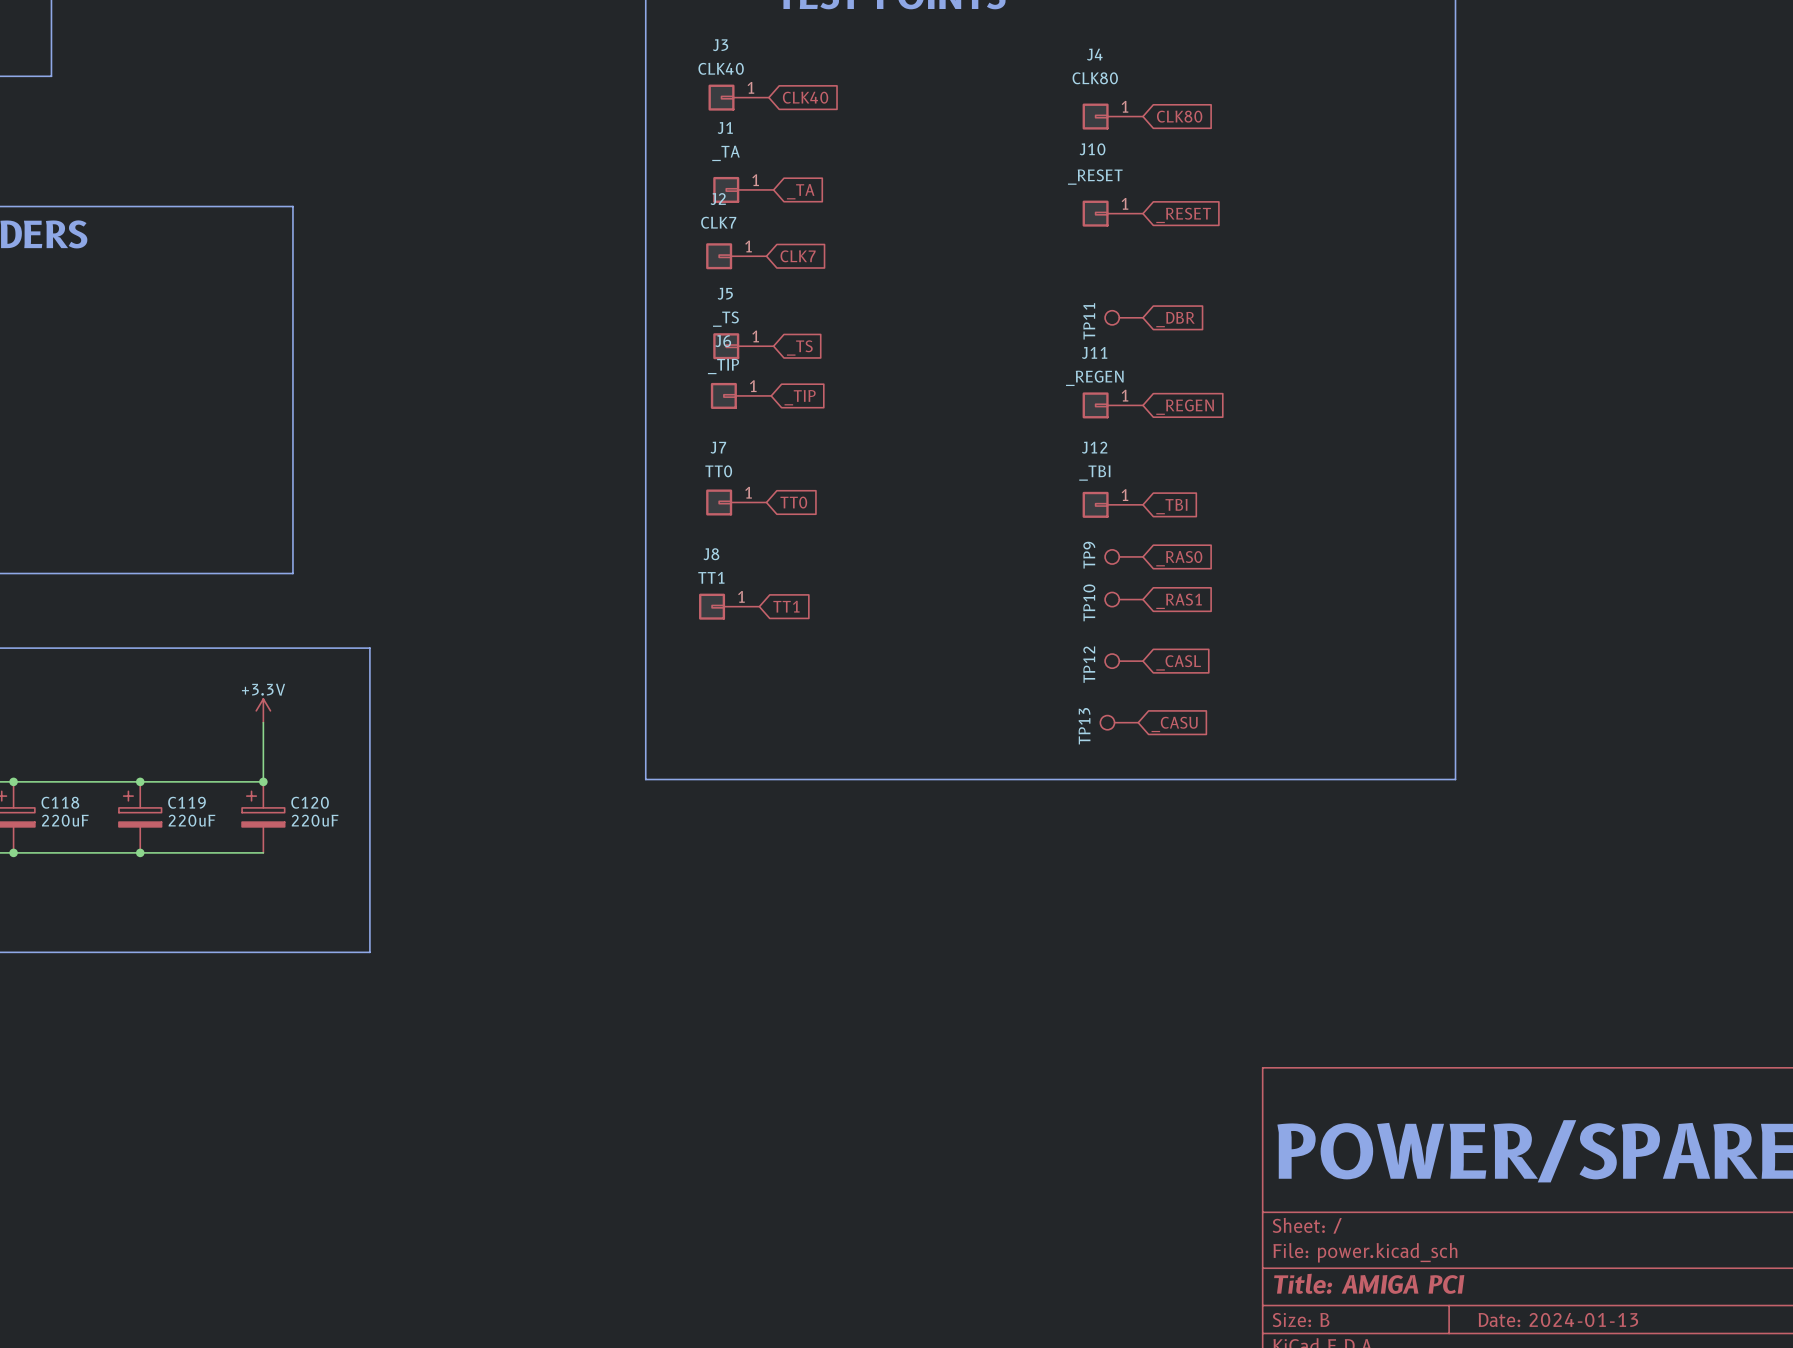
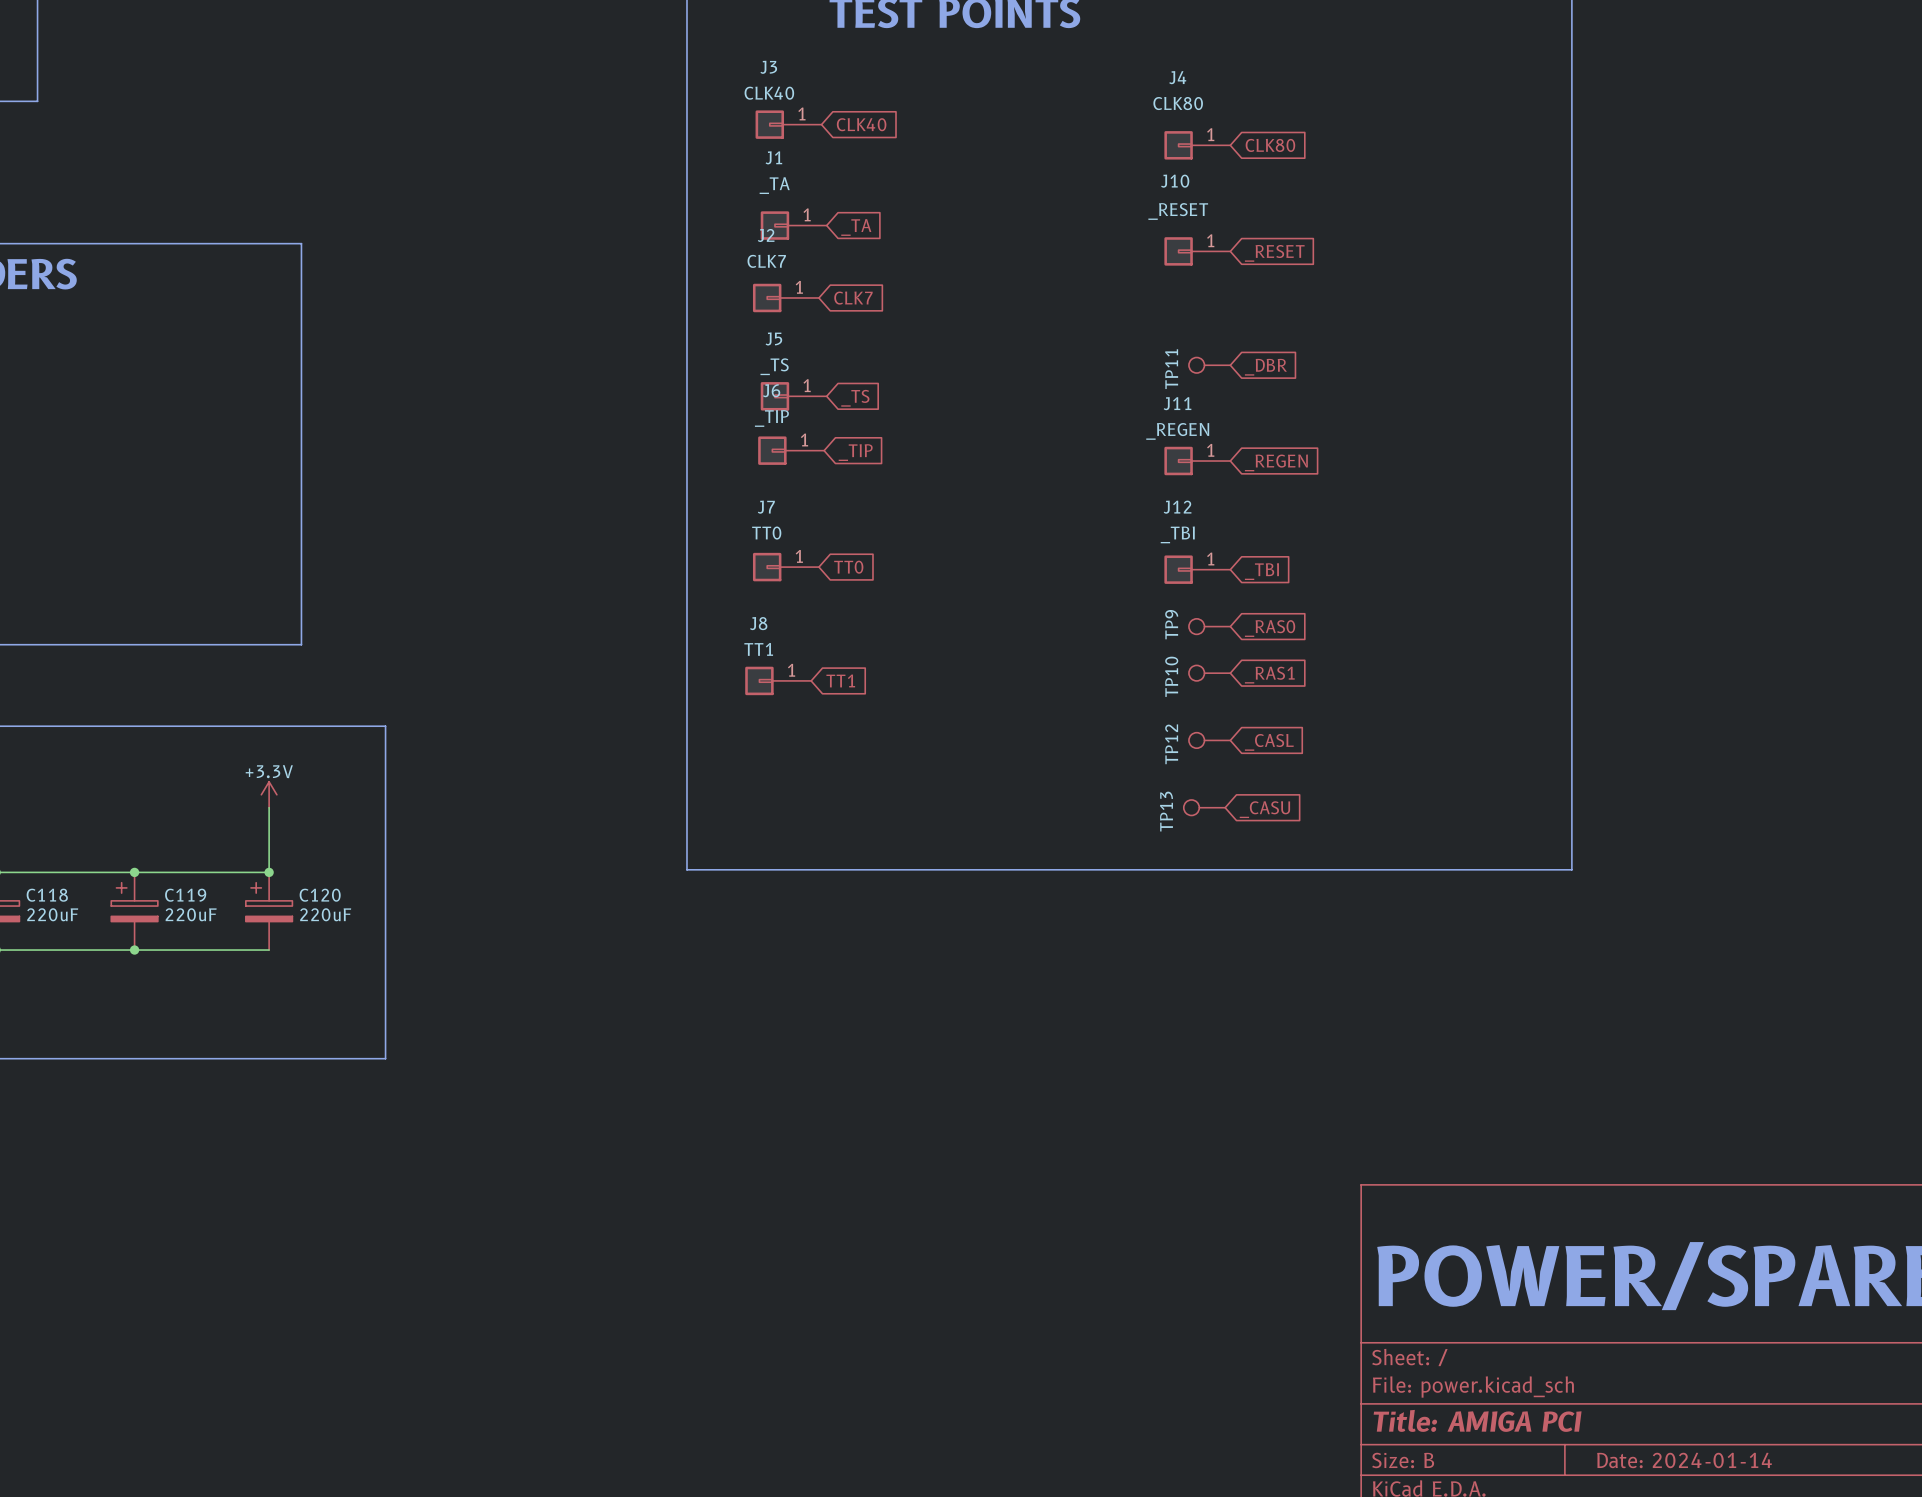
title block: Date: 2024-01-13 (1558, 1319) -> Date: 2024-01-14 (1684, 1460)

